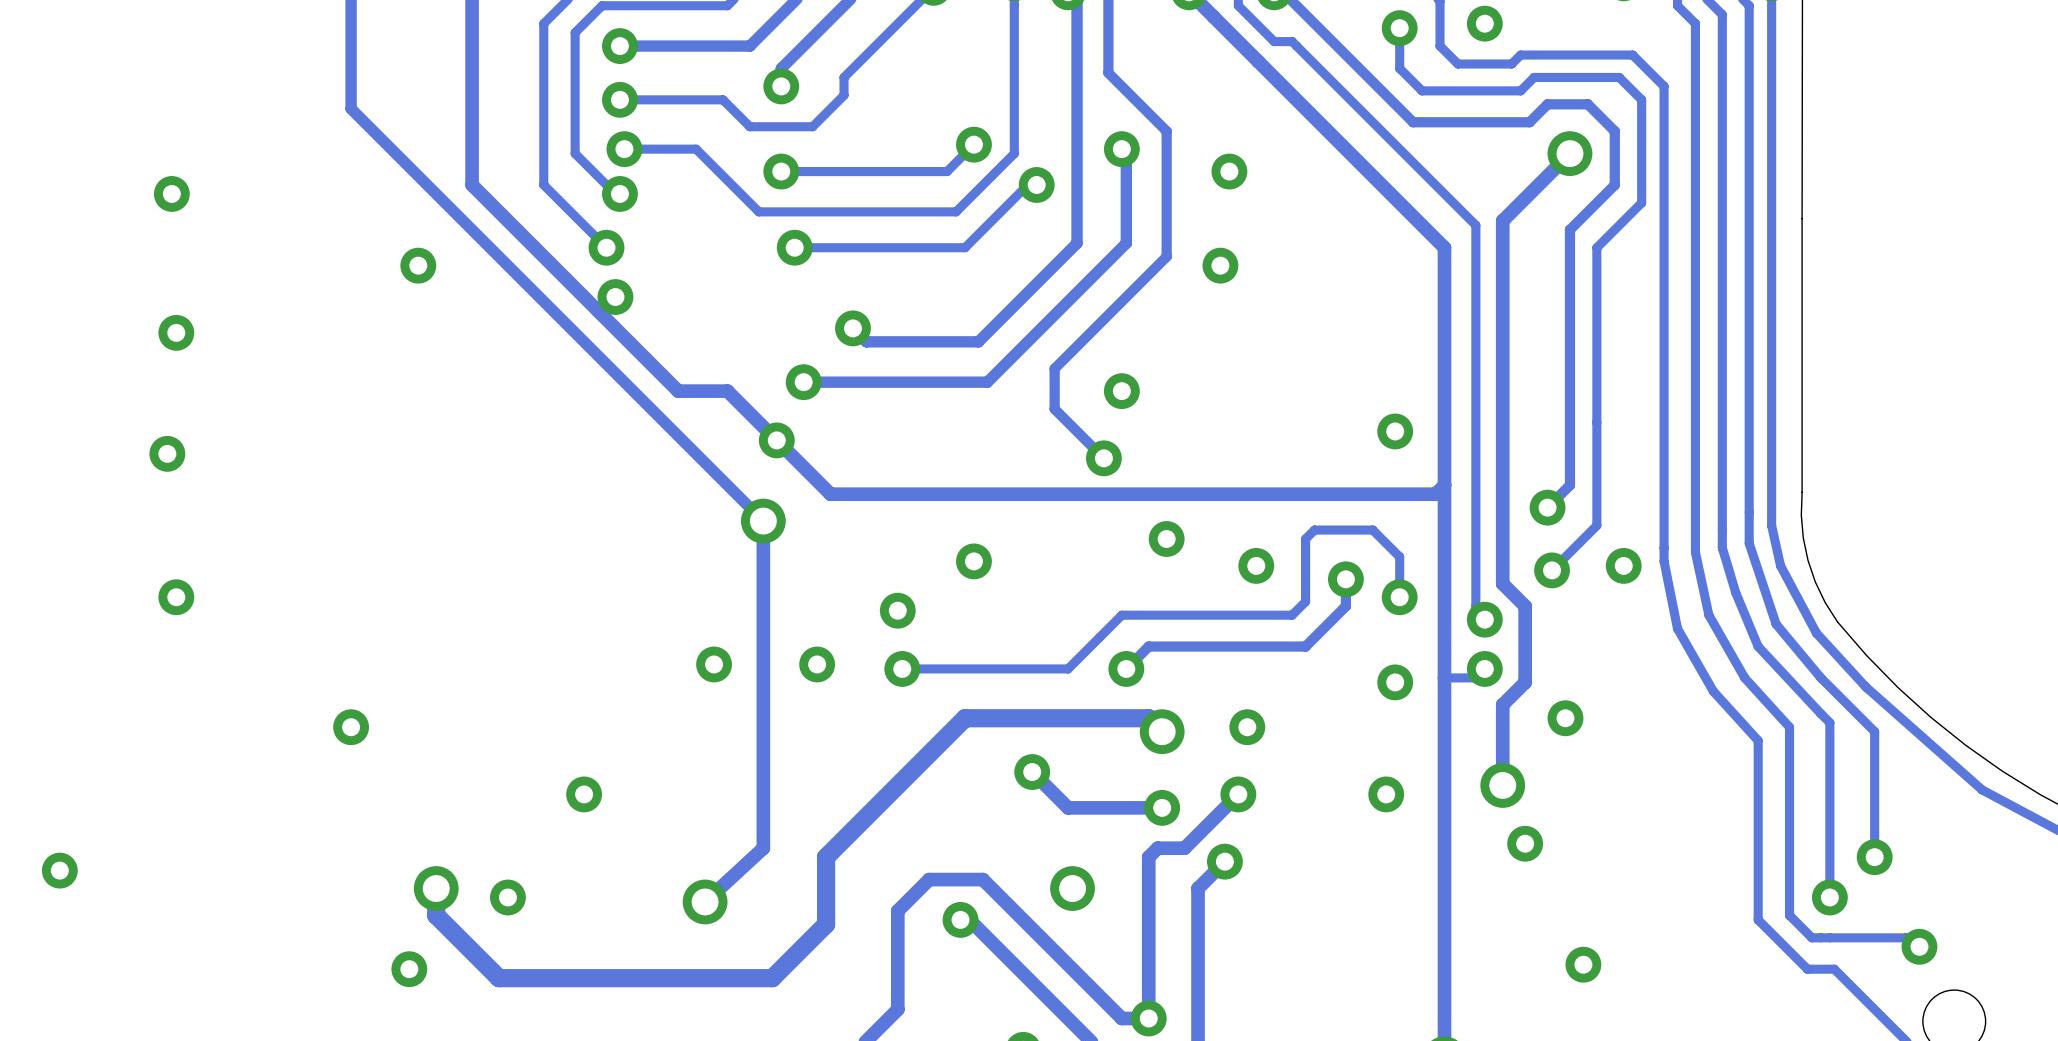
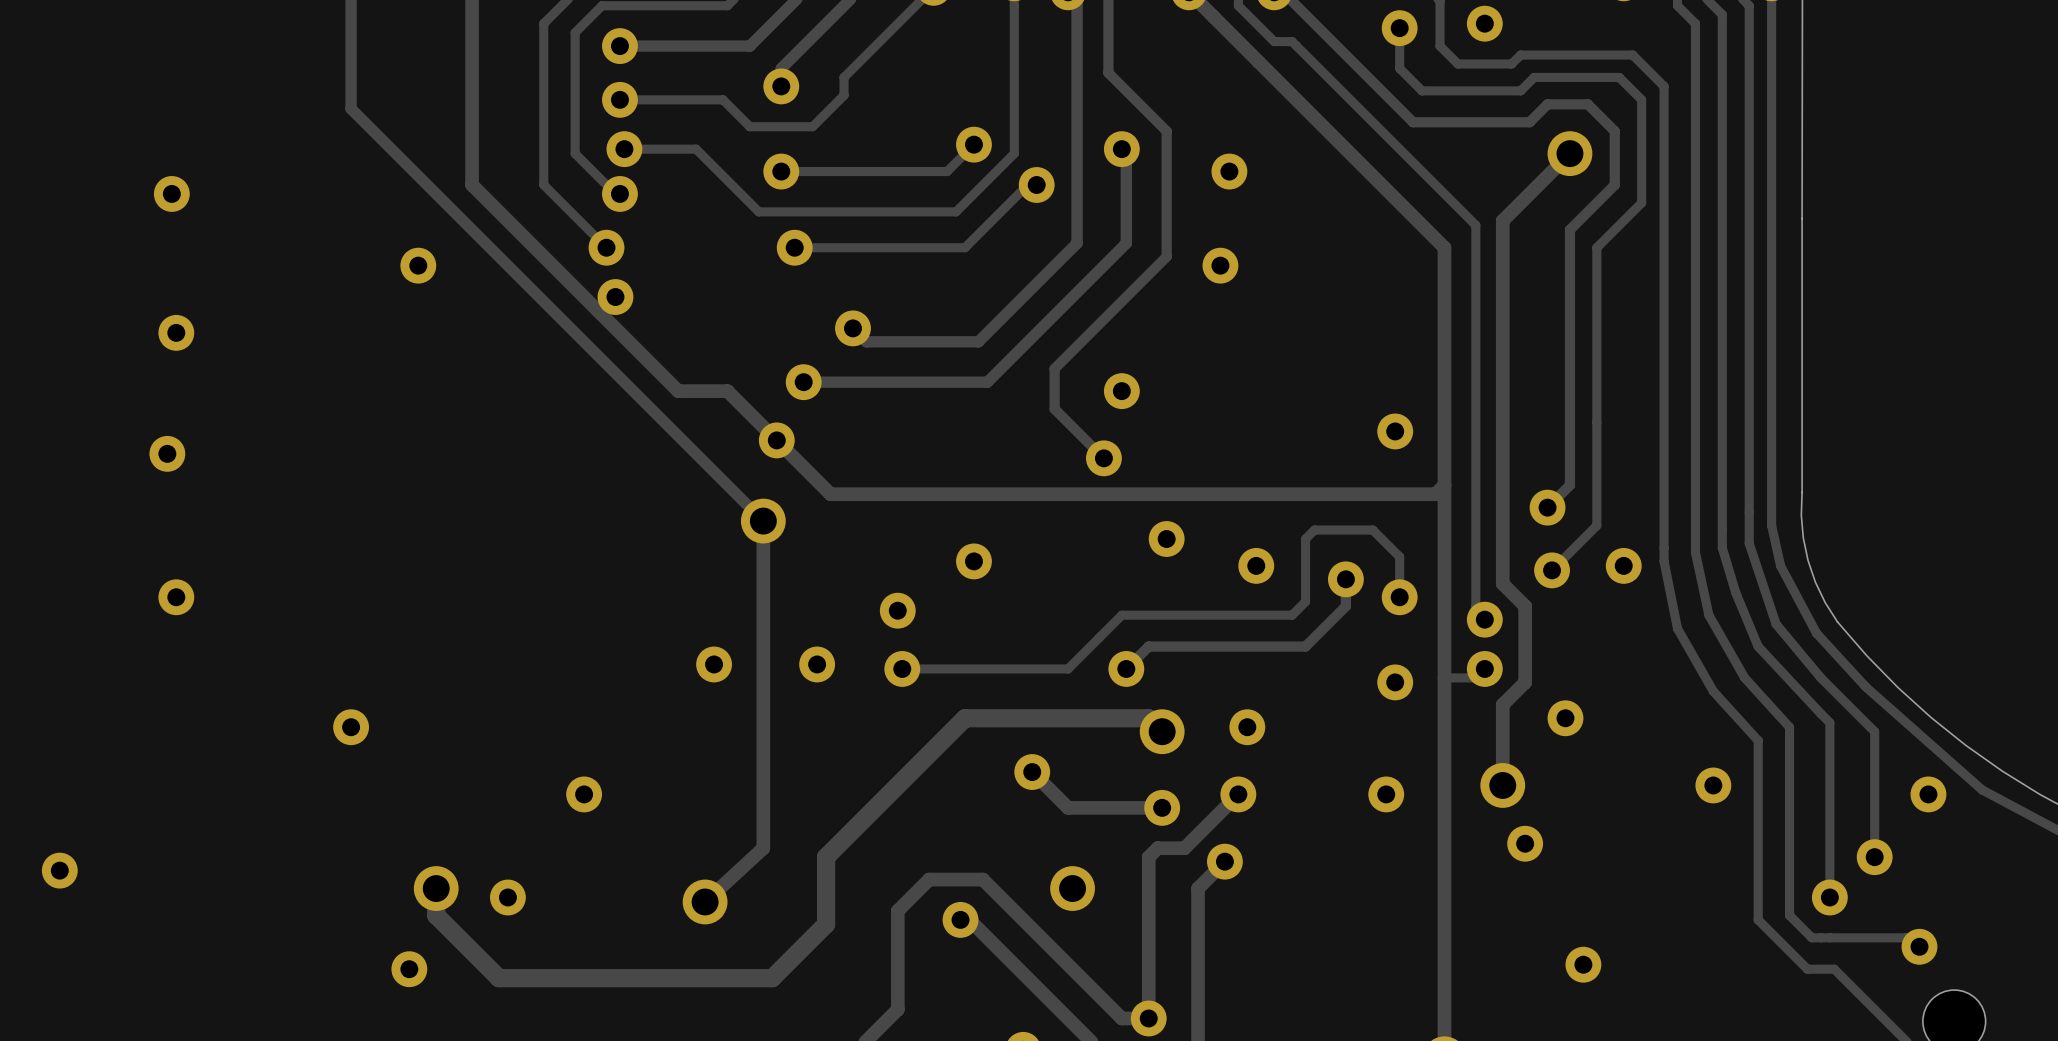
via: none -> (1713, 785)
via: none -> (1928, 794)

